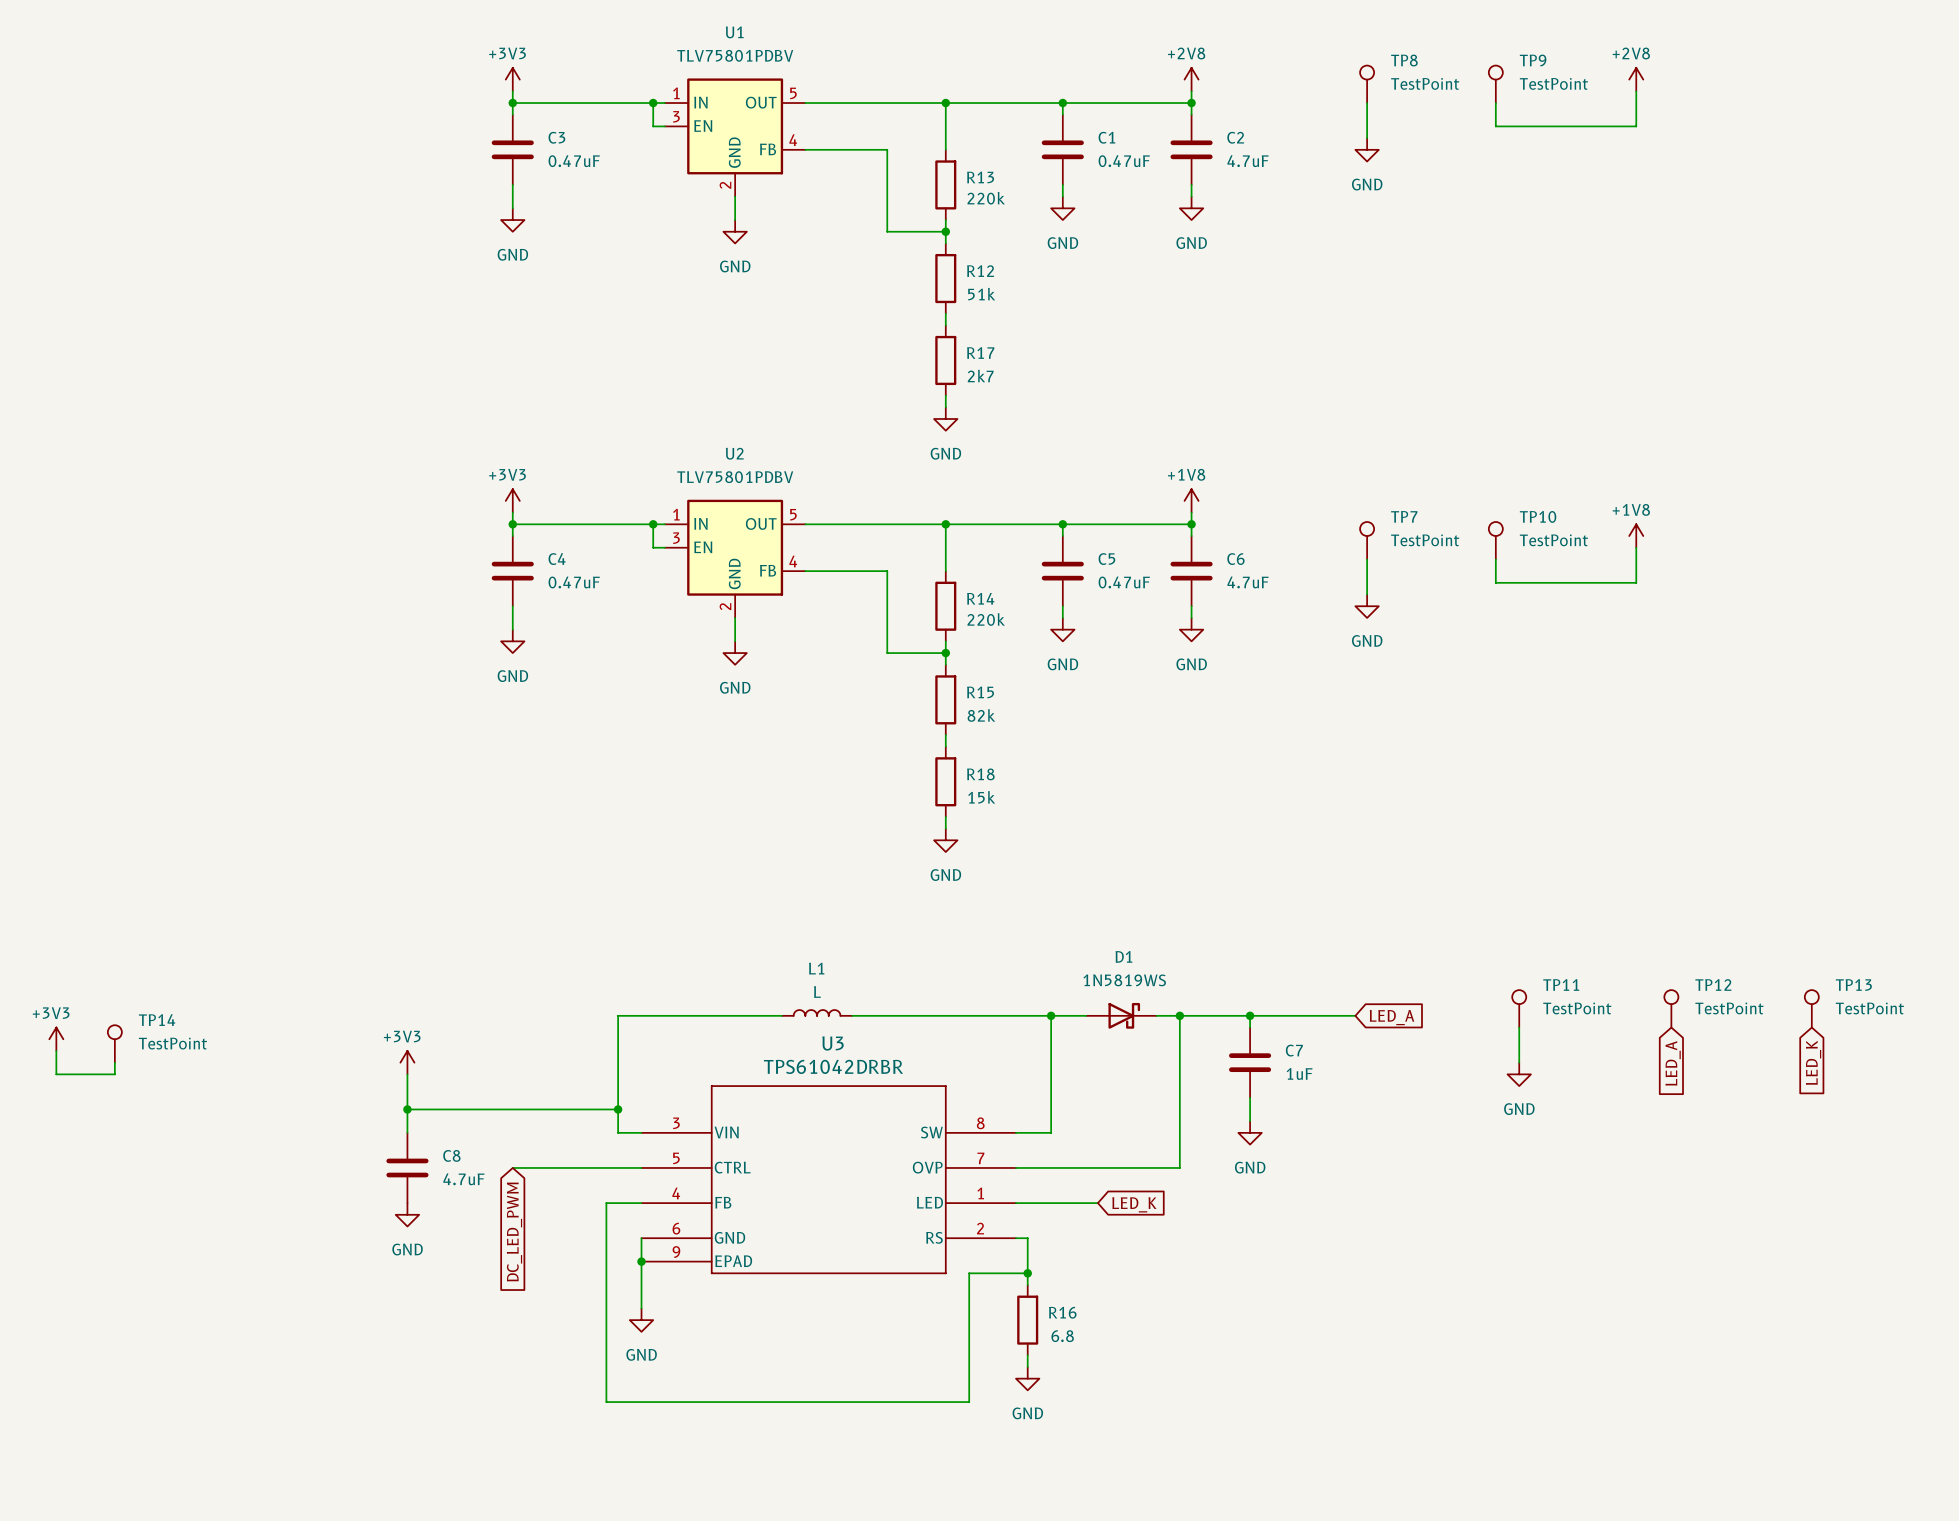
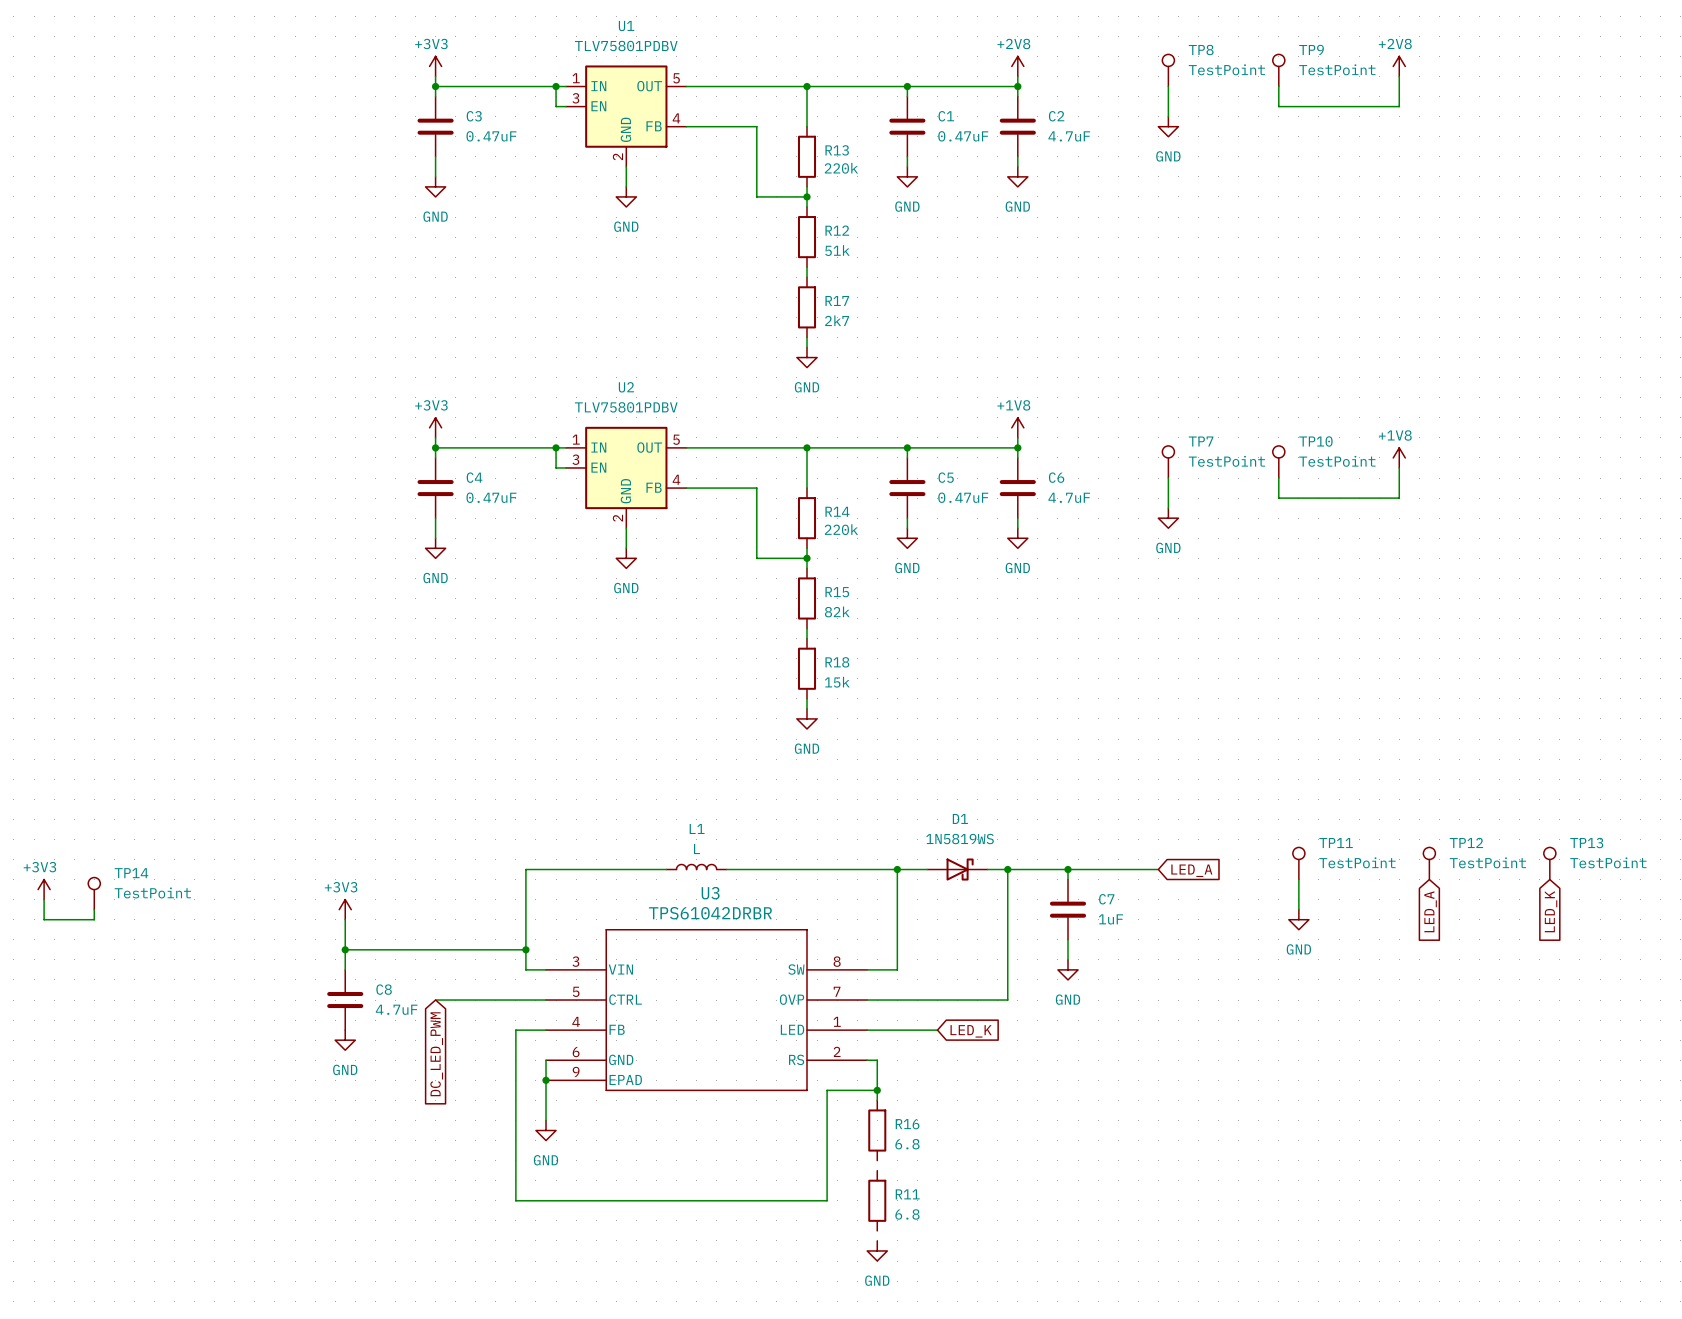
wire: (1027, 1355) (1027, 1366) -> none
power symbol position: GND (1027, 1378) -> GND (877, 1250)
R11: none -> 6.8 (877, 1200)

